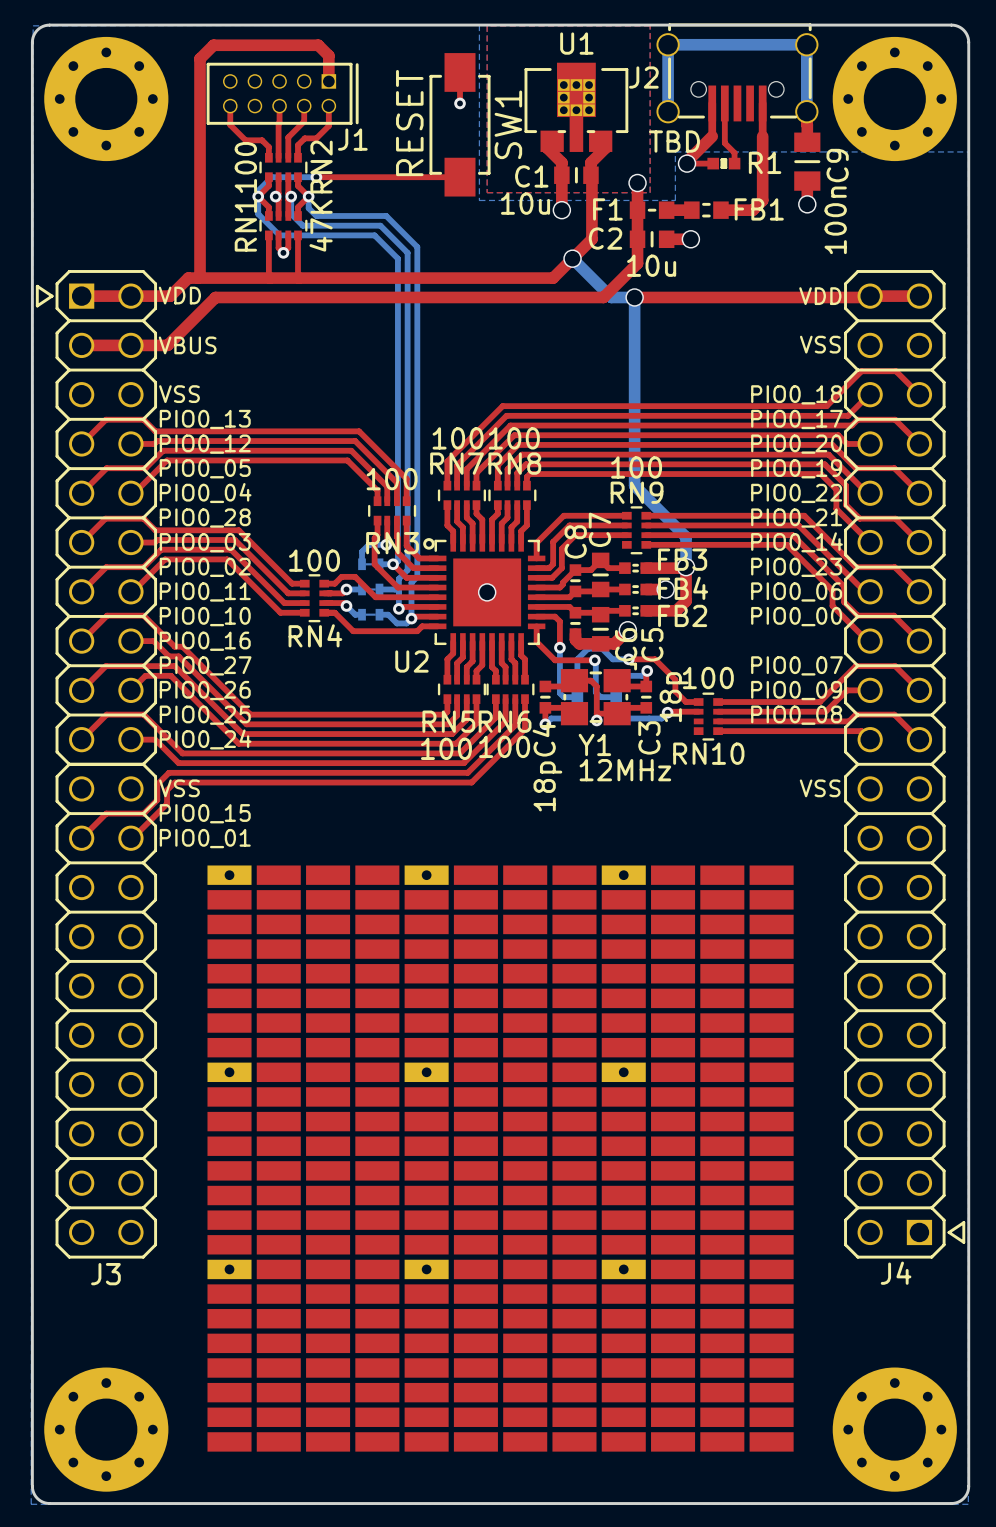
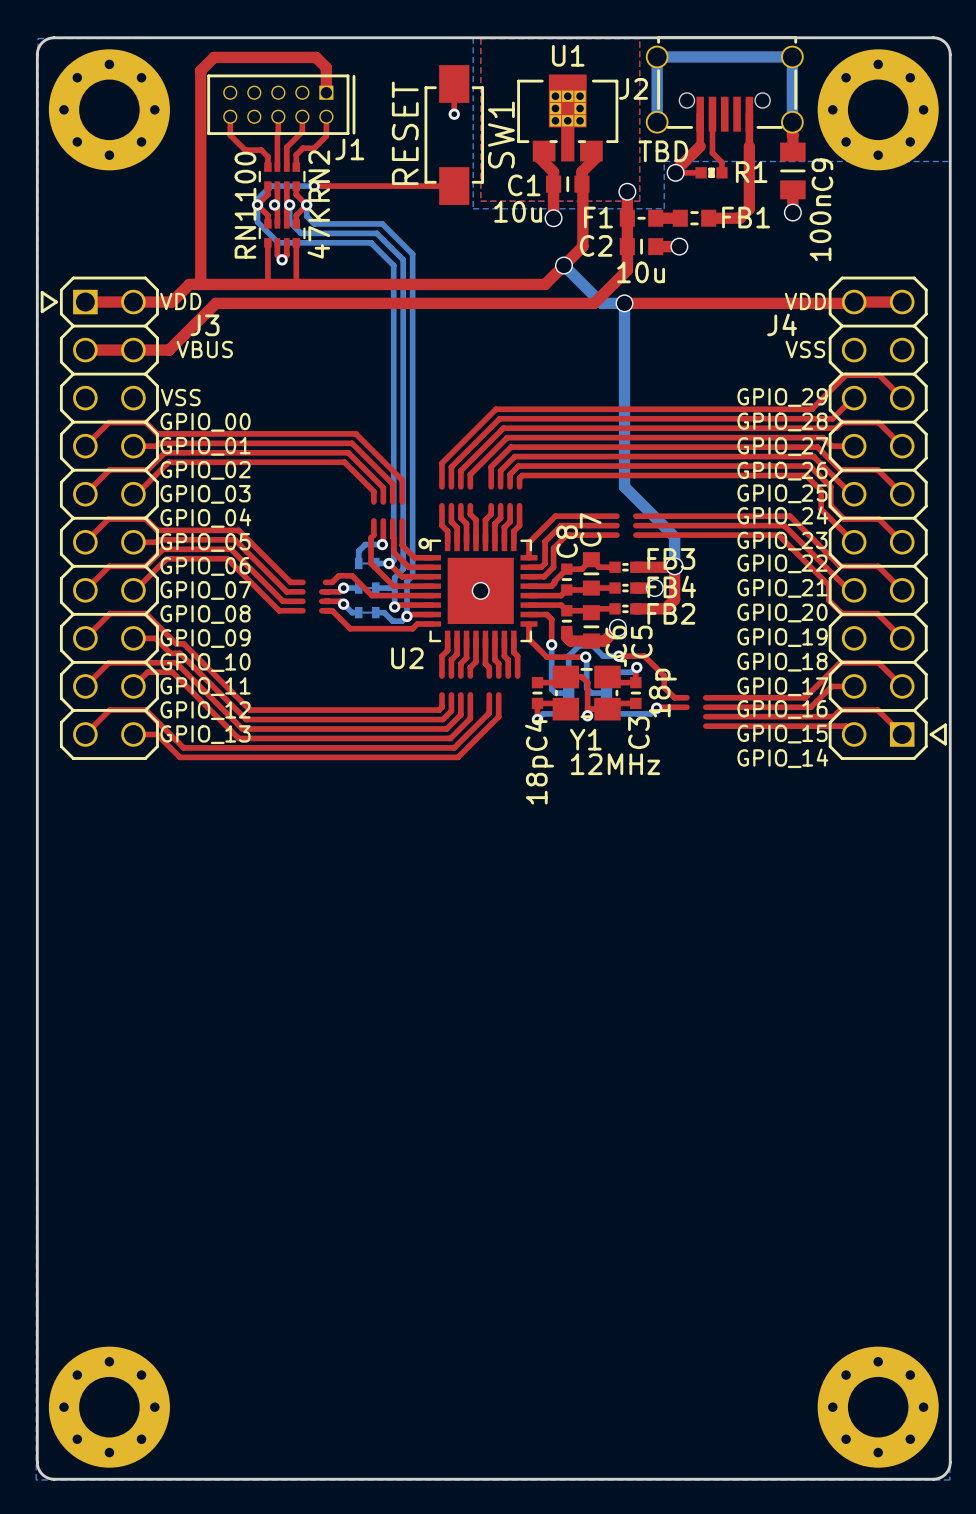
J3 footprint: [35, 270, 158, 1259] -> [40, 276, 159, 760]
J4 footprint: [844, 270, 966, 1259] -> [828, 276, 947, 760]
RN7: 100 (461, 495) -> none
RN8: 100 (512, 495) -> none
RN3: 100 (392, 510) -> none
RN9: 100 (636, 530) -> none
top track: (646, 544) (786, 544) (832, 590) (832, 605) (867, 641) (870, 641) -> none
RN4: 100 (314, 598) -> none
RN5: 100 (461, 689) -> none
RN6: 100 (510, 689) -> none
top track: (515, 699) (515, 725) (467, 772) (168, 772) (157, 784) (157, 800) (143, 813) (106, 813) (81, 838) -> none
top track: (525, 699) (525, 729) (471, 782) (174, 782) (167, 790) (167, 803) (131, 838) -> none
RN10: 100 (708, 716) -> none
part: (303, 961) -> none
part: (500, 961) -> none
part: (697, 961) -> none
part: (303, 1158) -> none
part: (500, 1158) -> none
part: (697, 1158) -> none
J4 name position: J4 (896, 1273) -> J4 (782, 324)
J3 name position: J3 (105, 1274) -> J3 (205, 325)
part: (303, 1355) -> none
part: (500, 1355) -> none
part: (697, 1355) -> none

